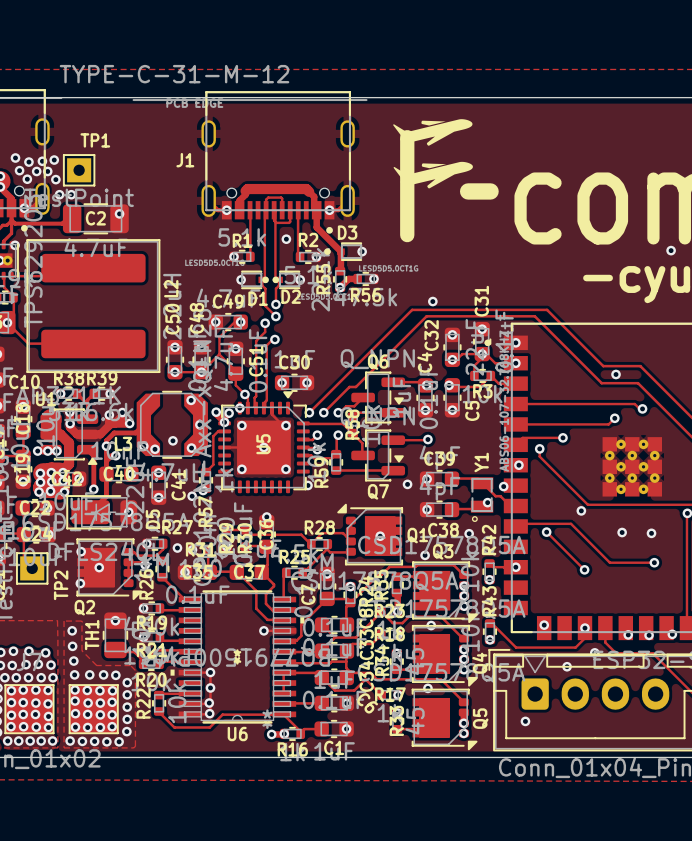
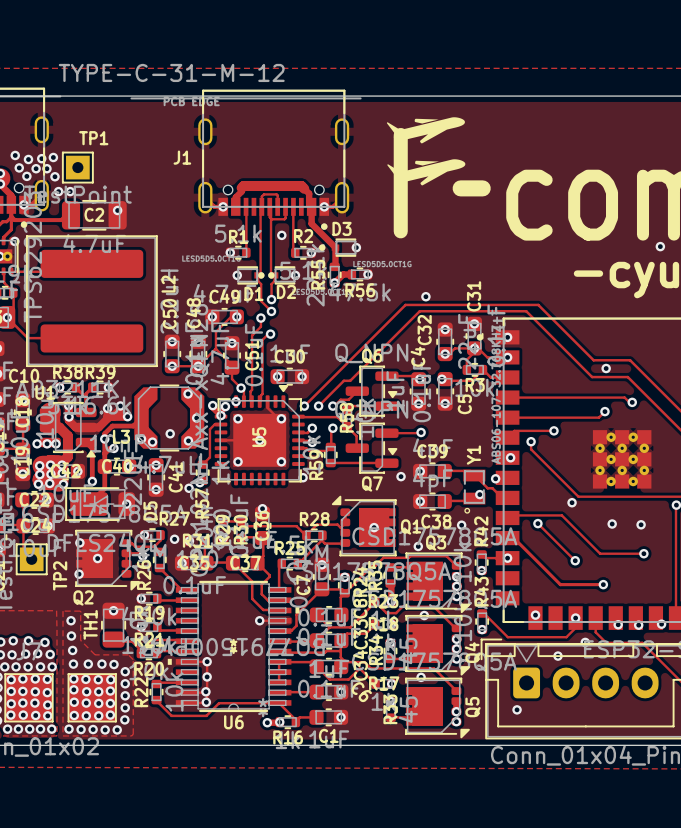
track: none -> (507, 538) (513, 538) (560, 584) (603, 584)
via: none -> (603, 584)

